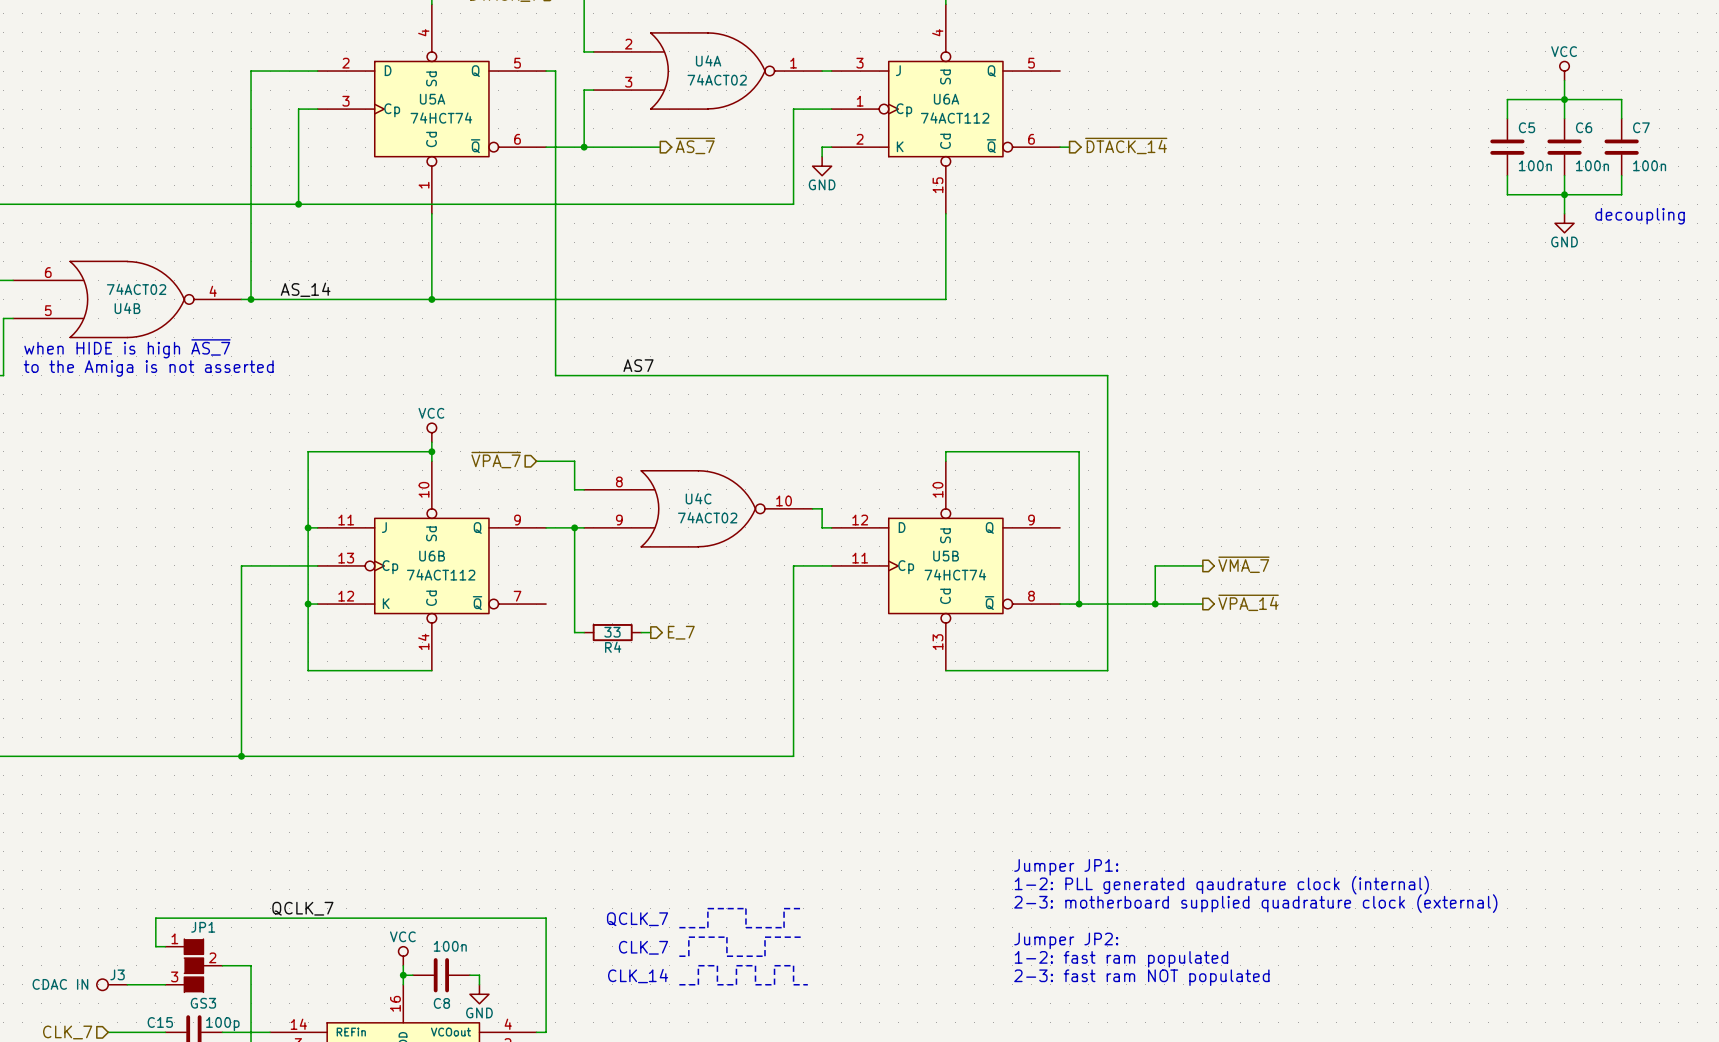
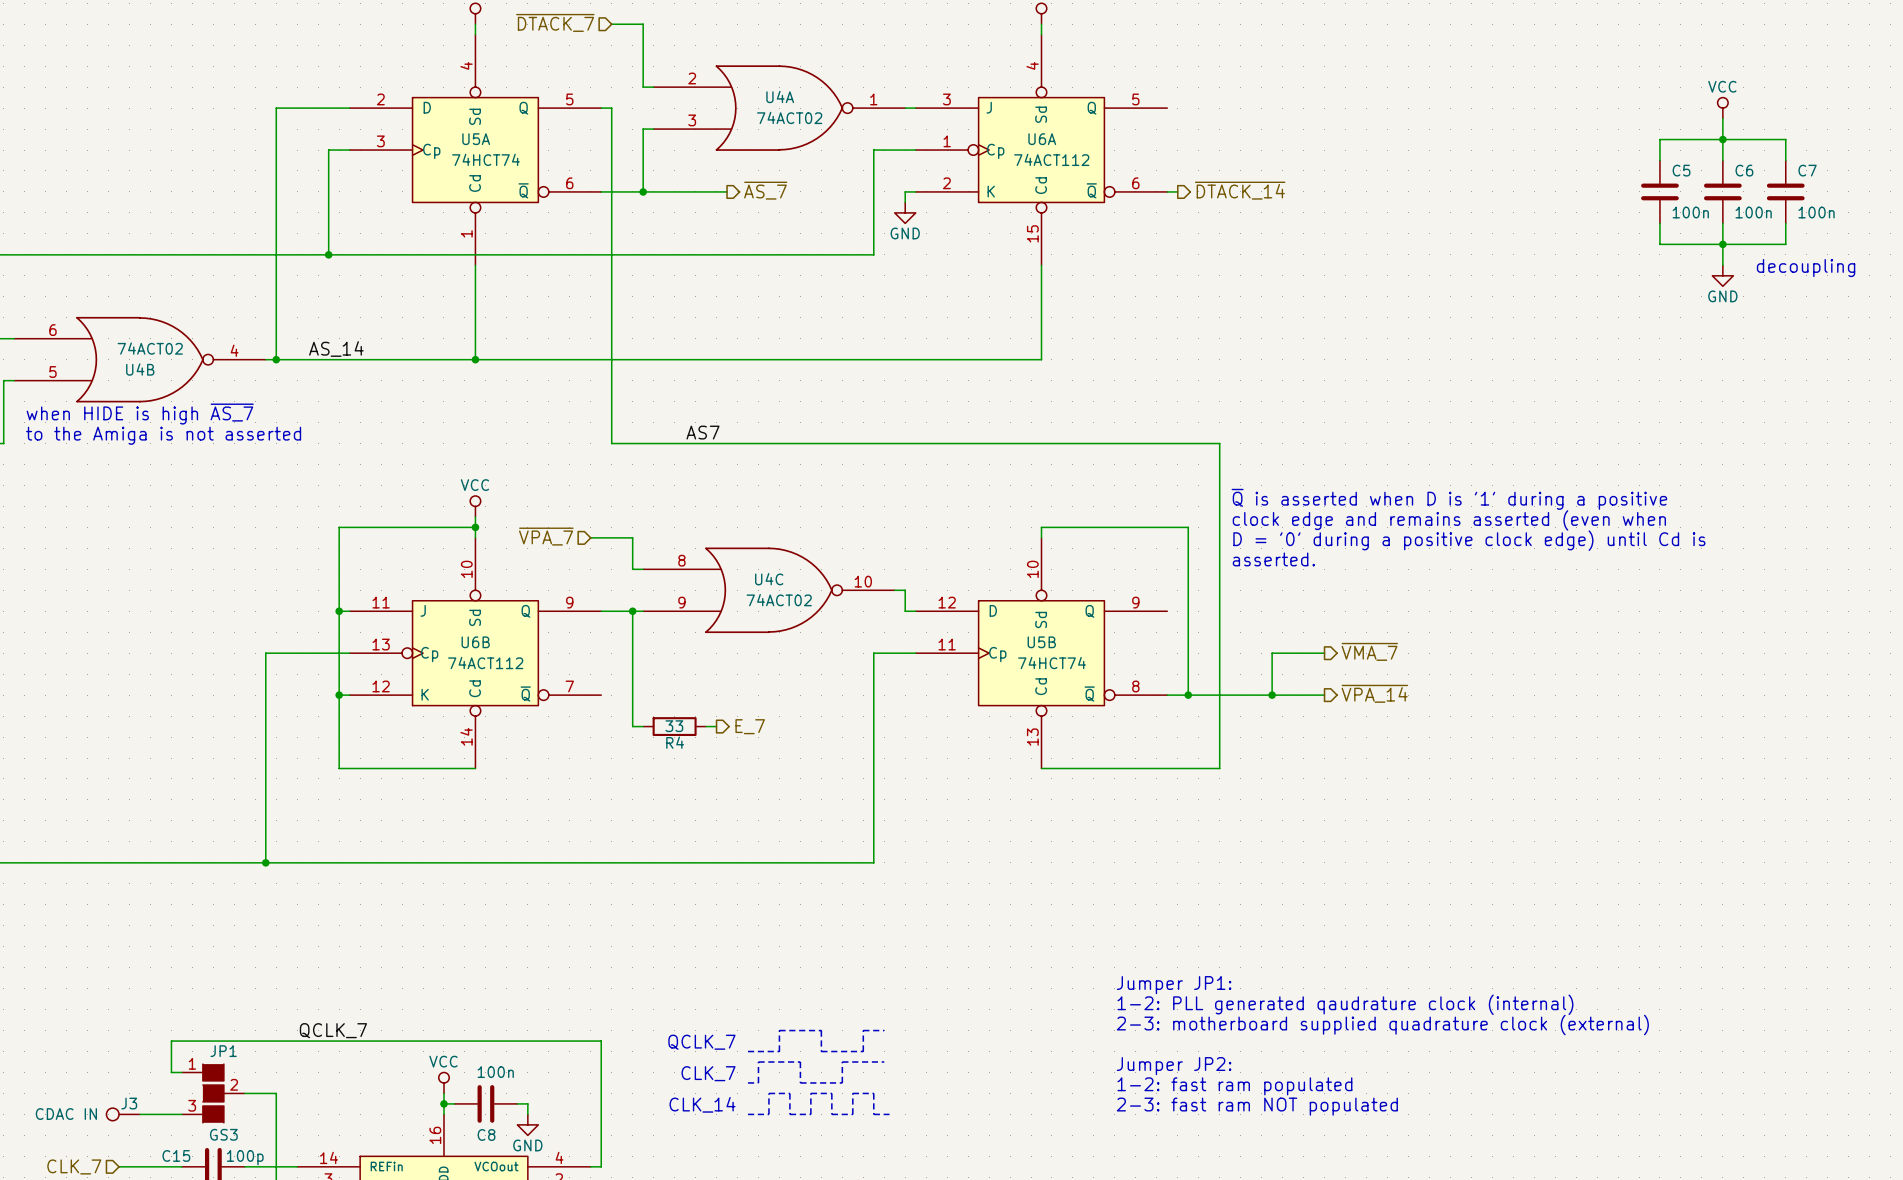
text: none -> ~{Q} is asserted when D is '1' during a positive (1449, 499)
text: none -> clock edge and remains asserted (even when (1449, 520)
text: none -> D = '0' during a positive clock edge) until Cd is (1469, 540)
text: none -> asserted. (1273, 559)

